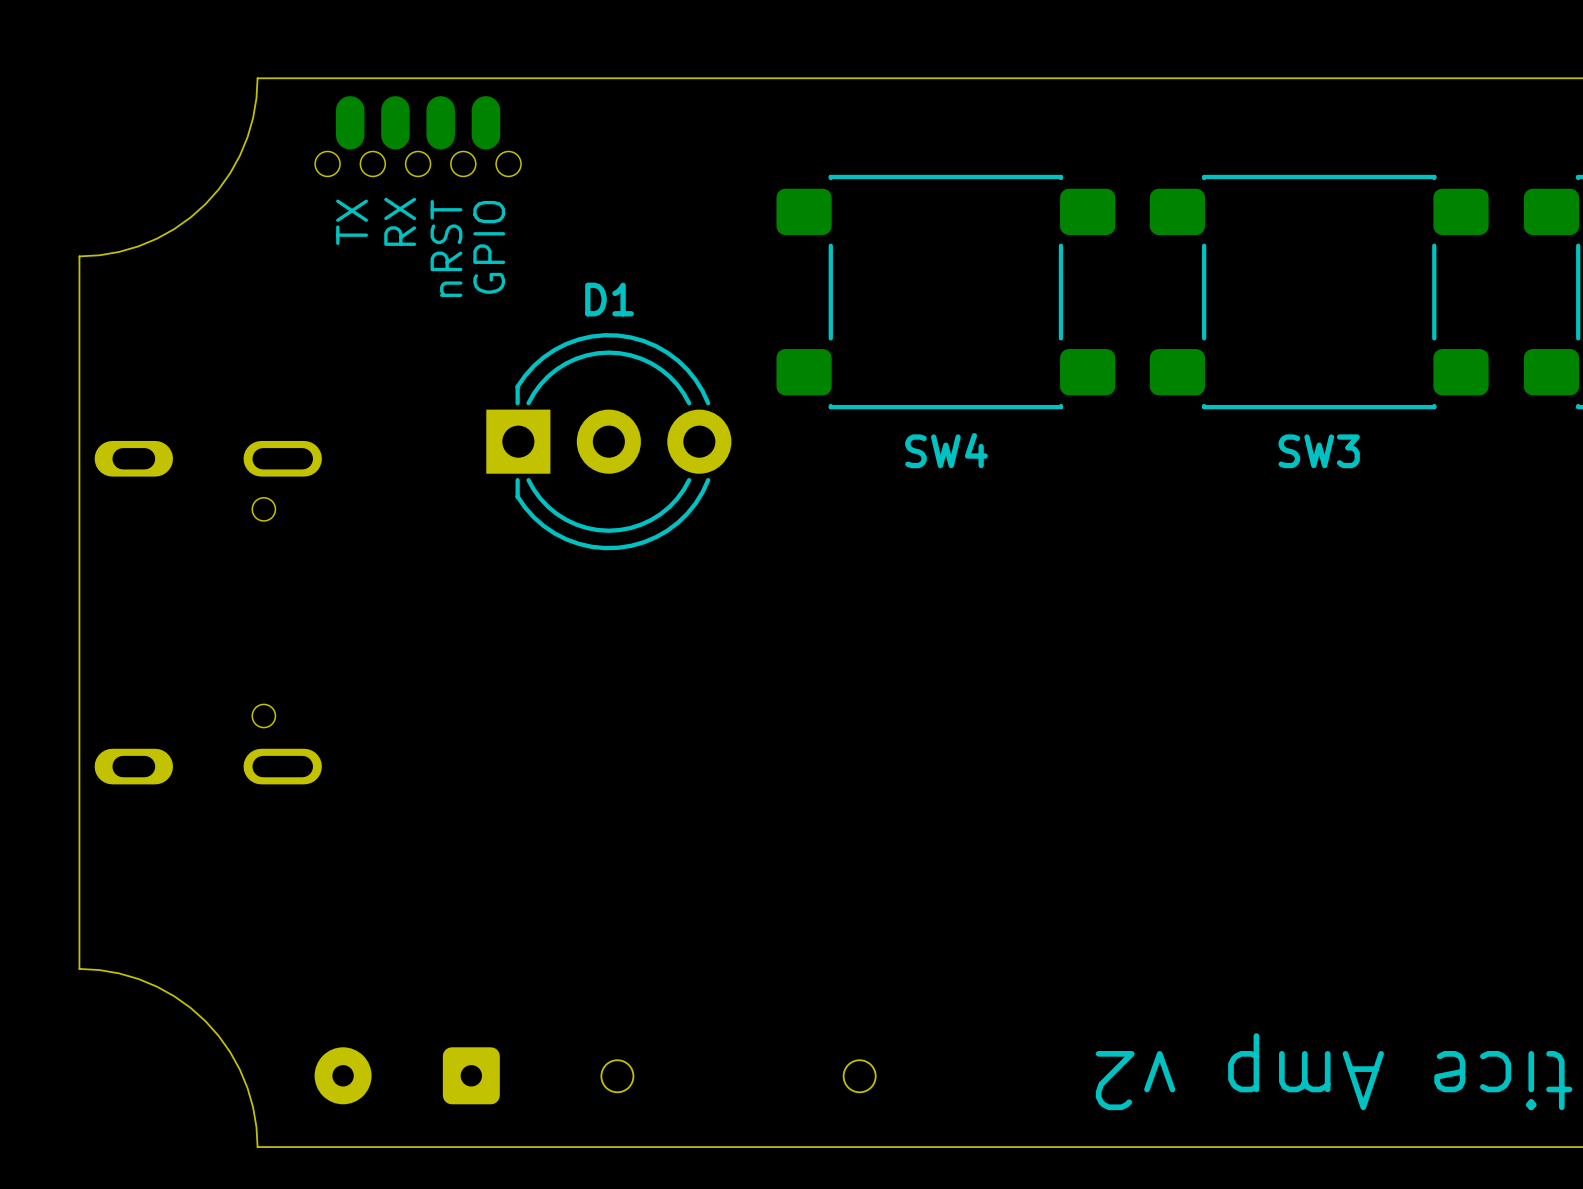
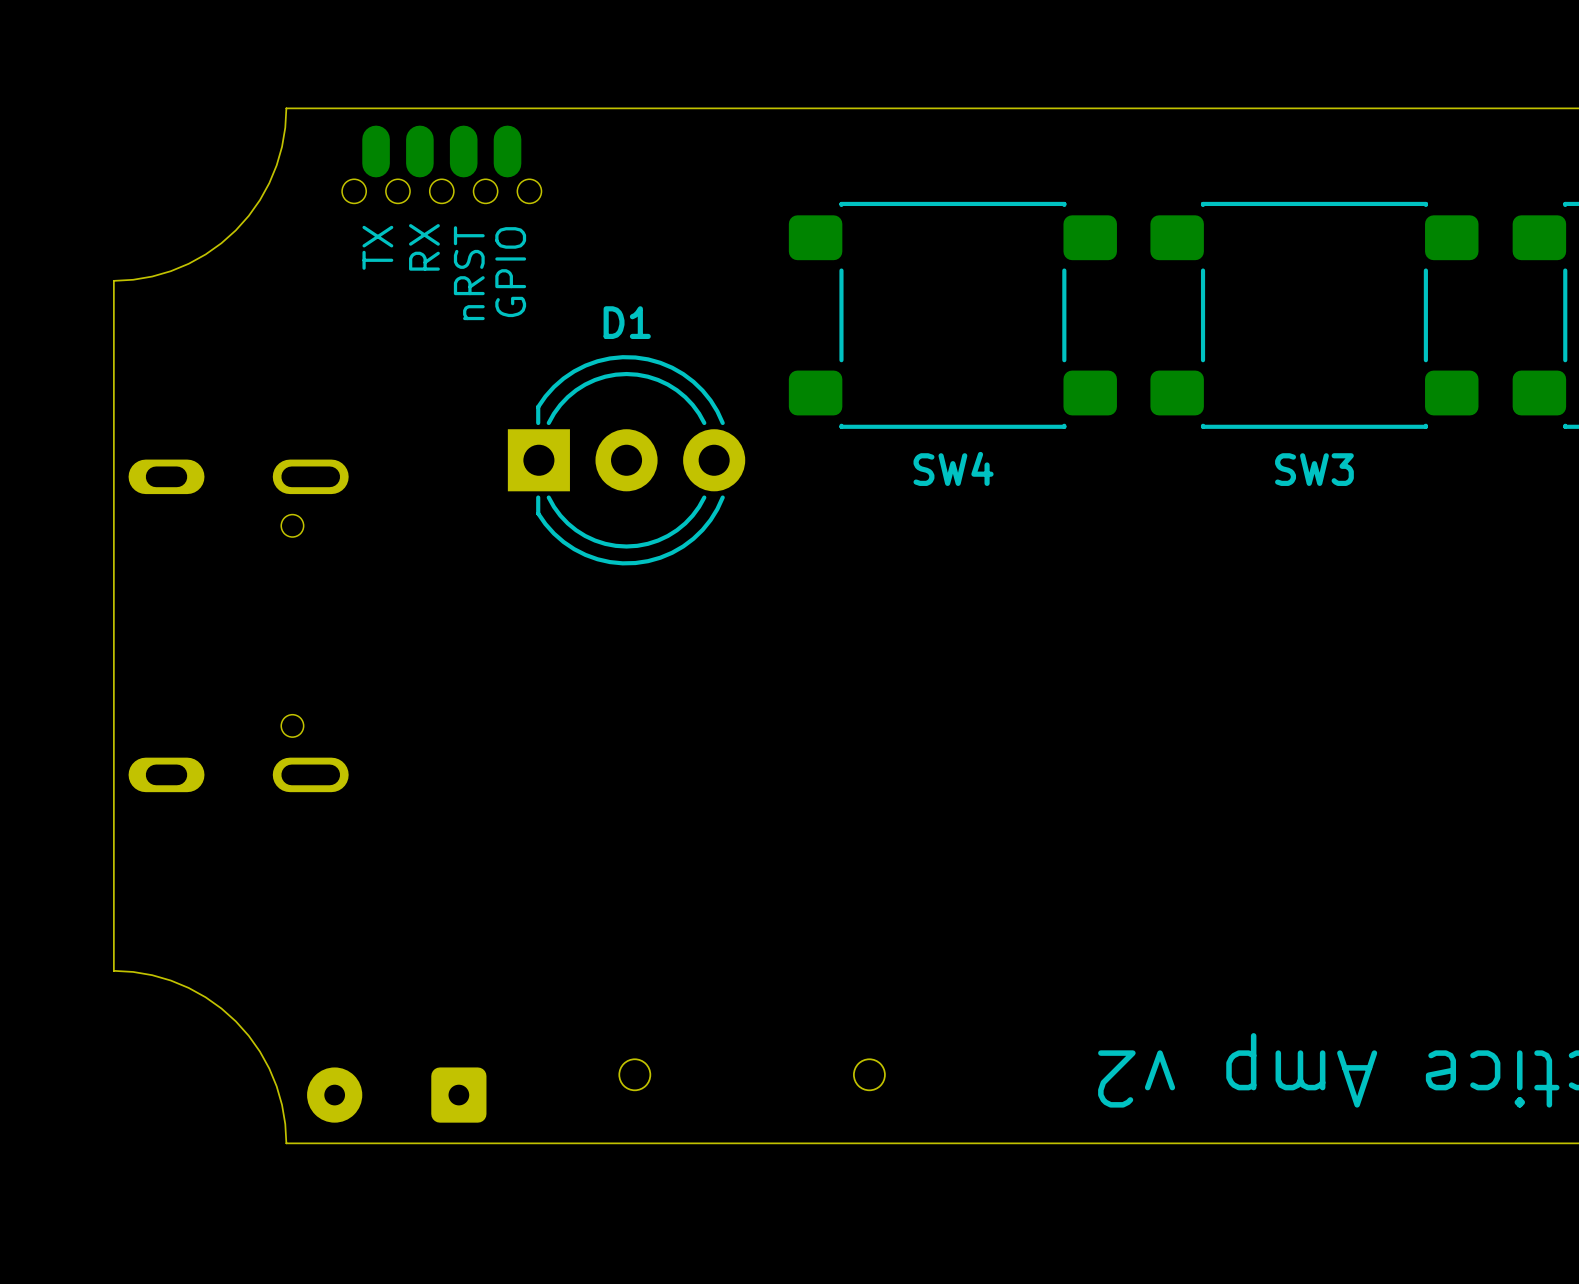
part position: (407, 1075) -> (396, 1095)

